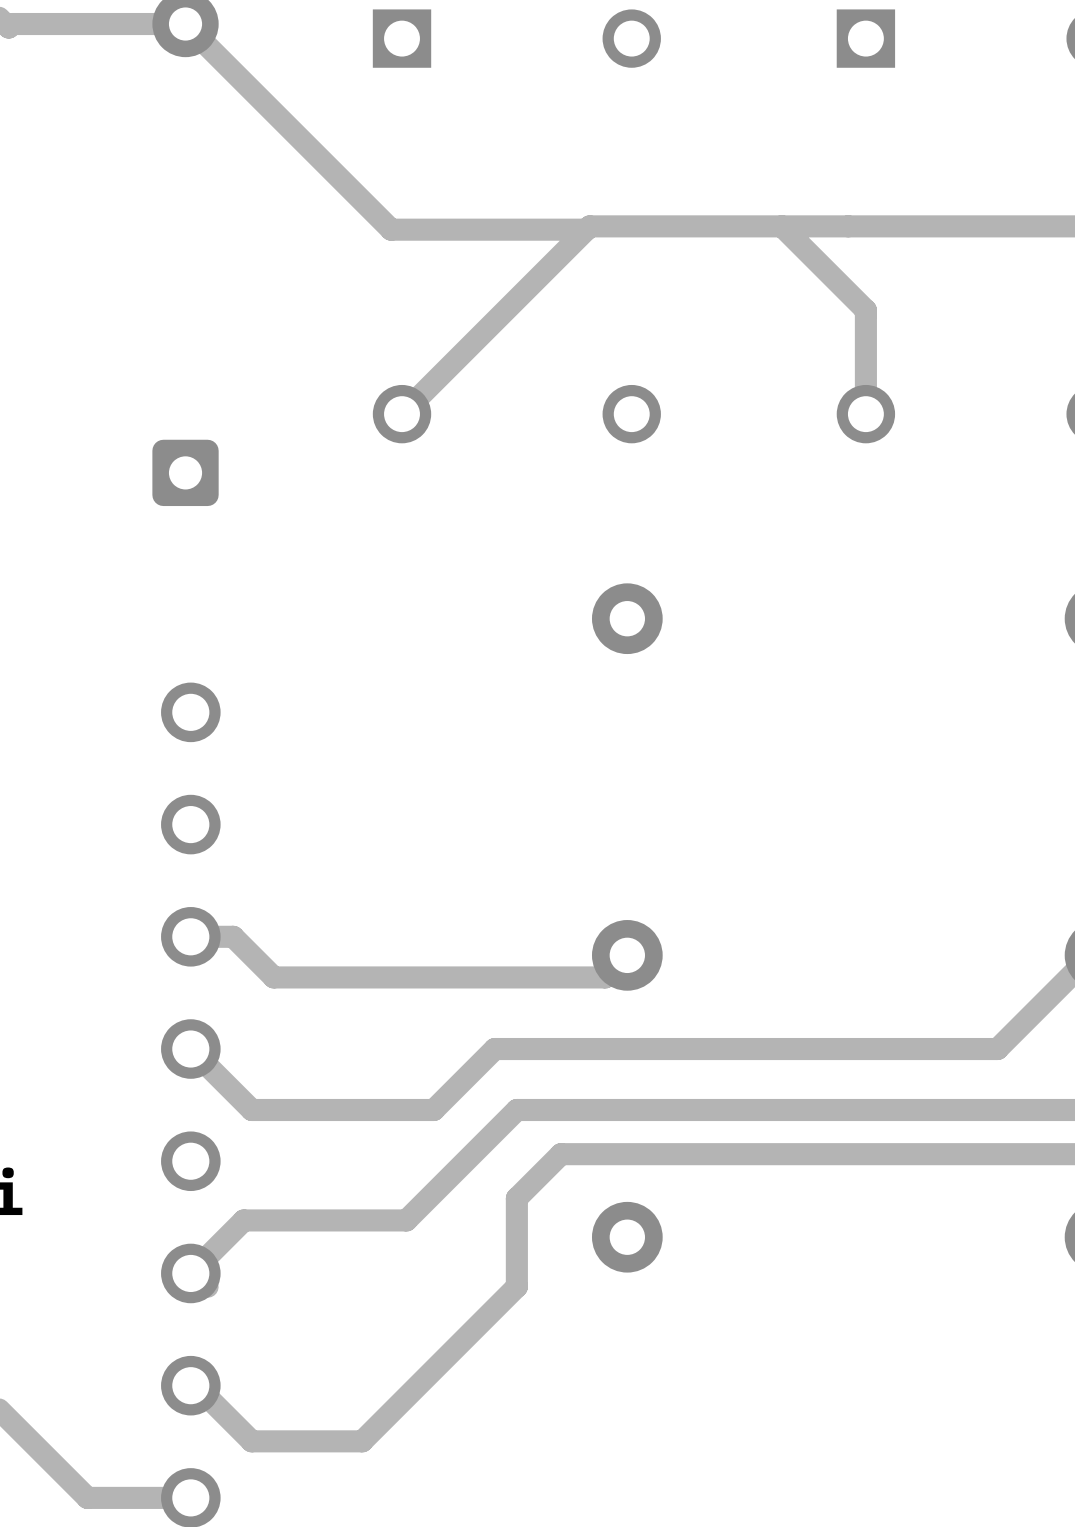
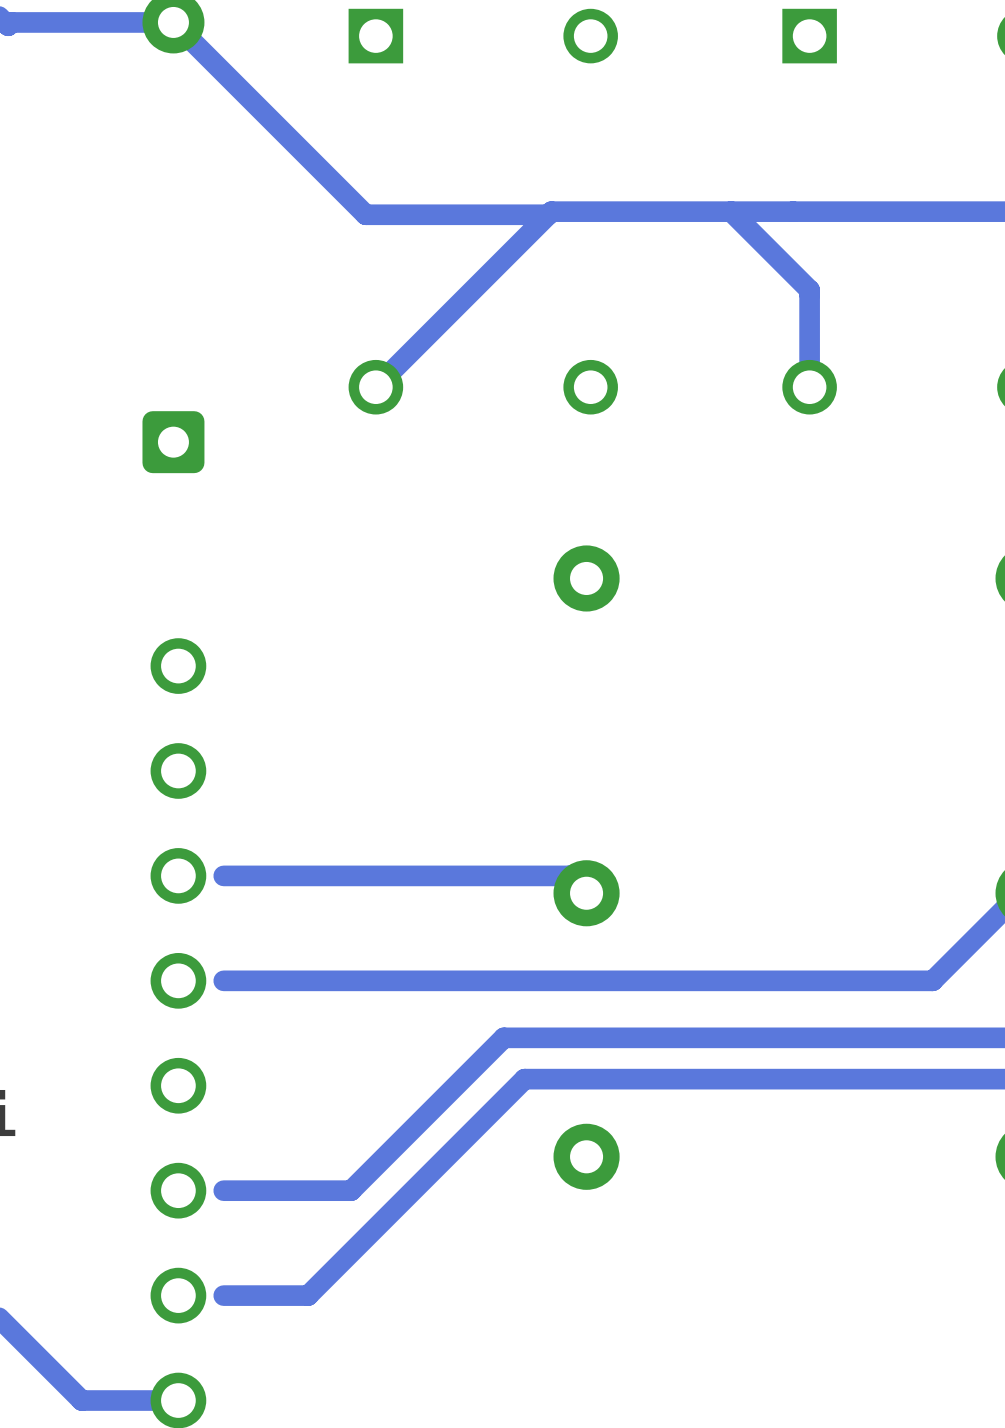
track: (185, 933) (189, 936) (233, 936) (273, 977) (605, 977) (627, 955) -> (223, 875) (569, 875) (586, 893)
track: (185, 1043) (251, 1109) (433, 1109) (494, 1049) -> (223, 980) (462, 980)
track: (538, 1109) (516, 1109) (406, 1220) (243, 1220) (190, 1273) (194, 1273) (207, 1286) -> (503, 1037) (351, 1190) (223, 1190)
track: (516, 1198) (516, 1286) (362, 1441) (251, 1441) (196, 1385) (190, 1385) -> (483, 1120) (308, 1295) (223, 1295)

